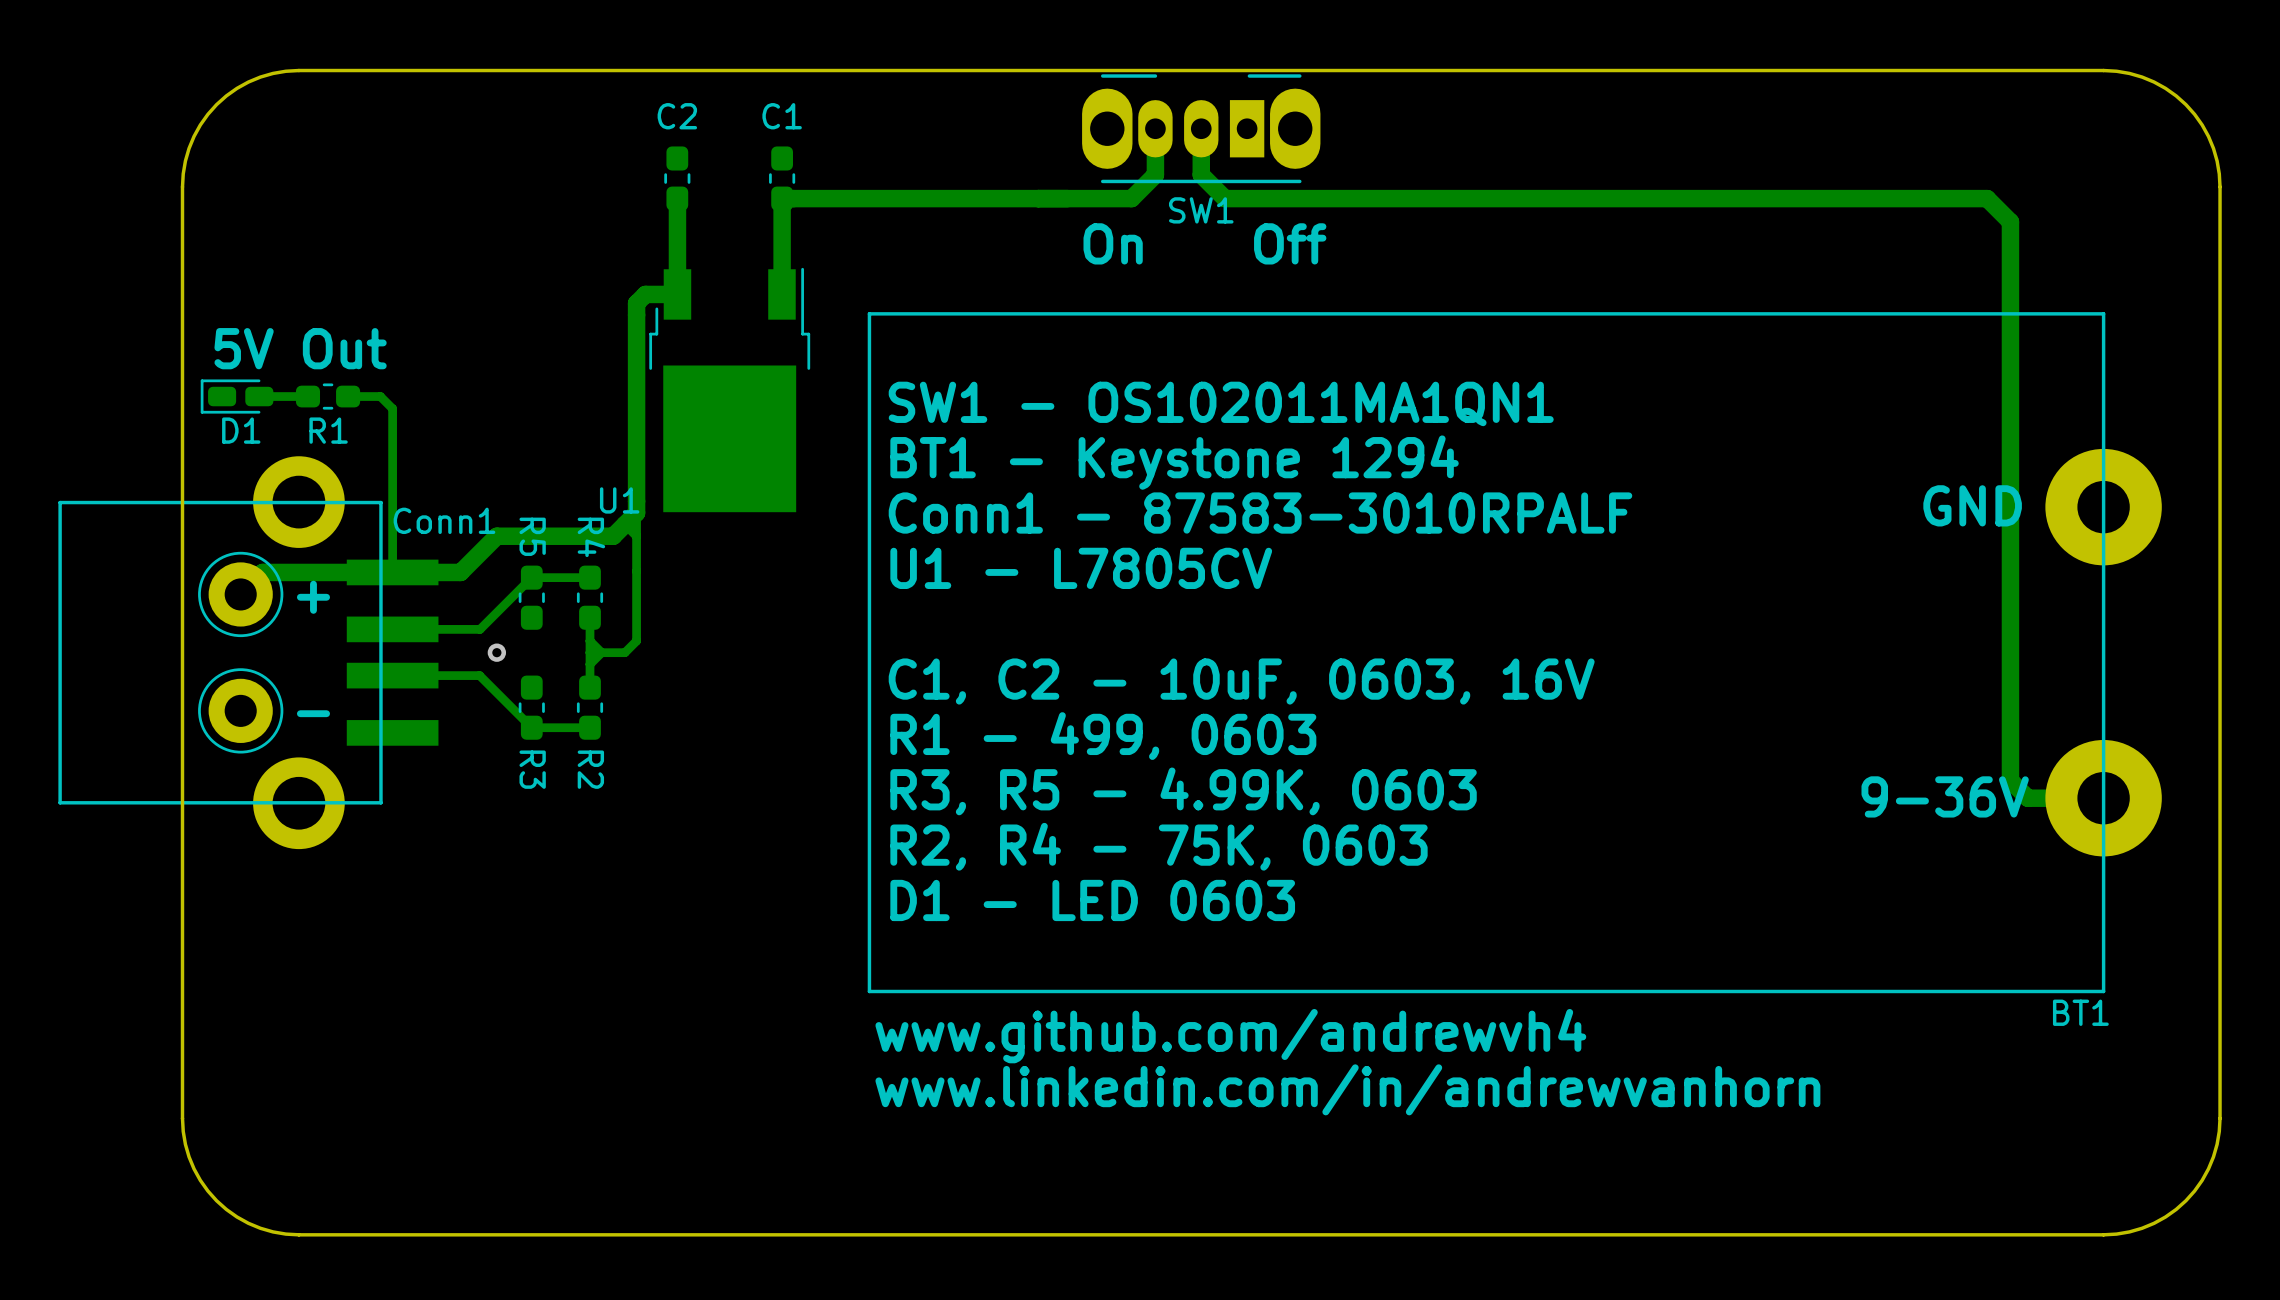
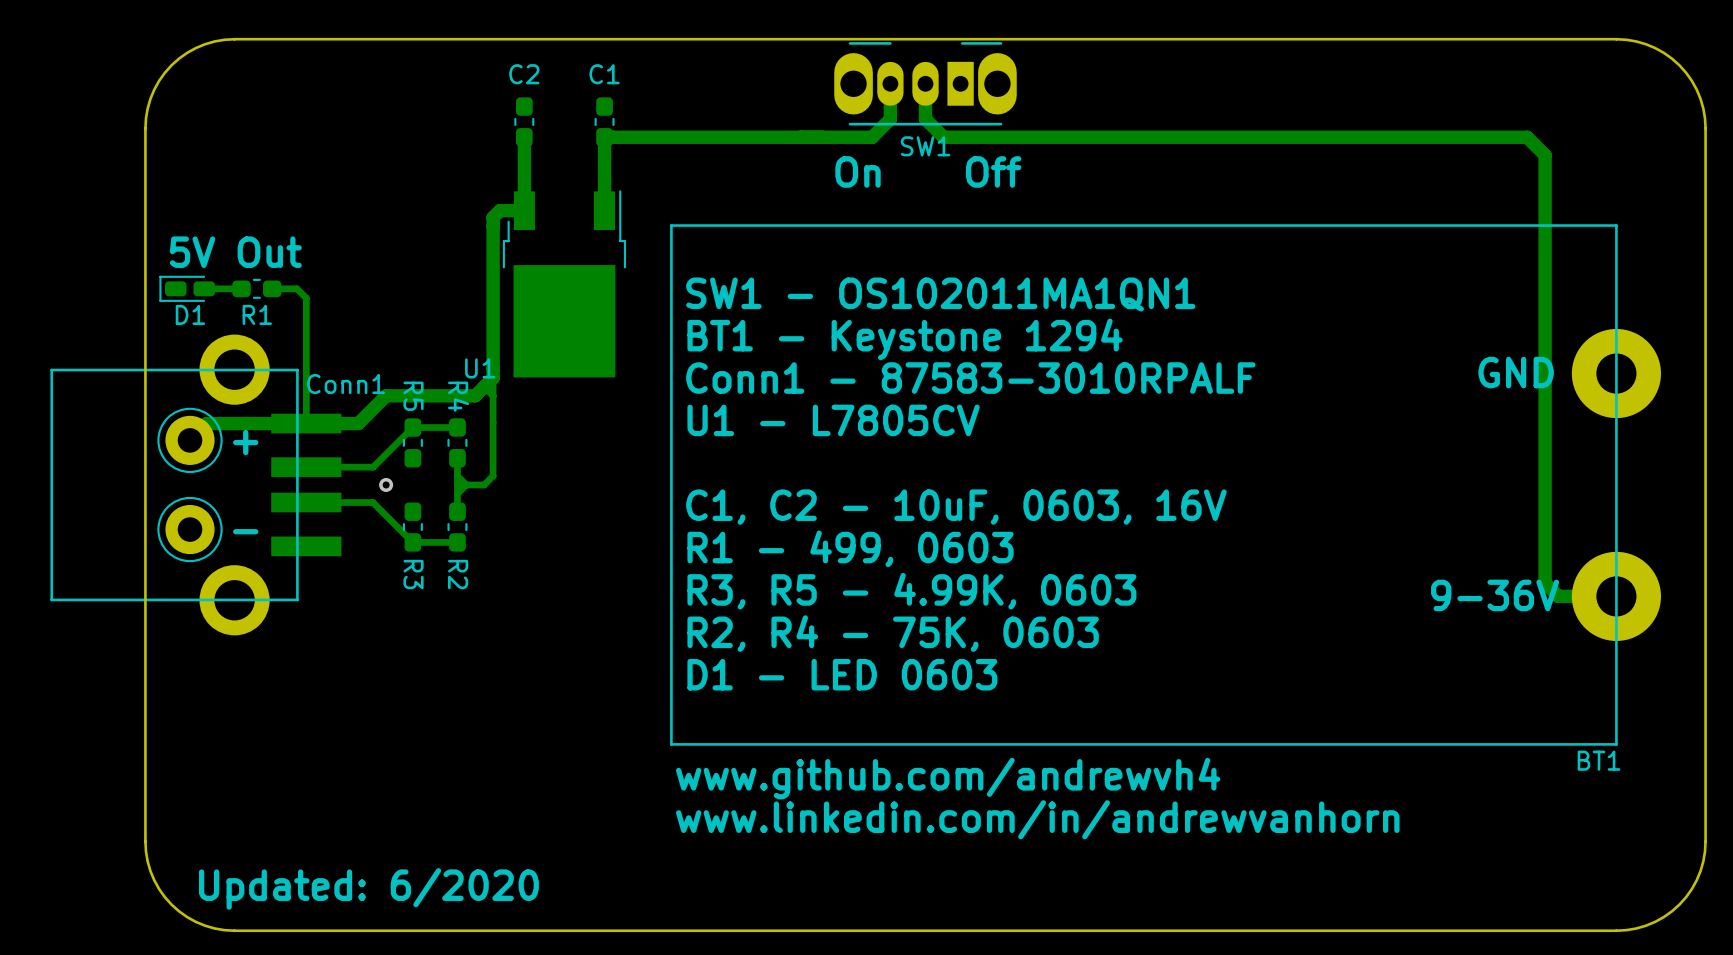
text: none -> Updated: 6/2020 (368, 888)

